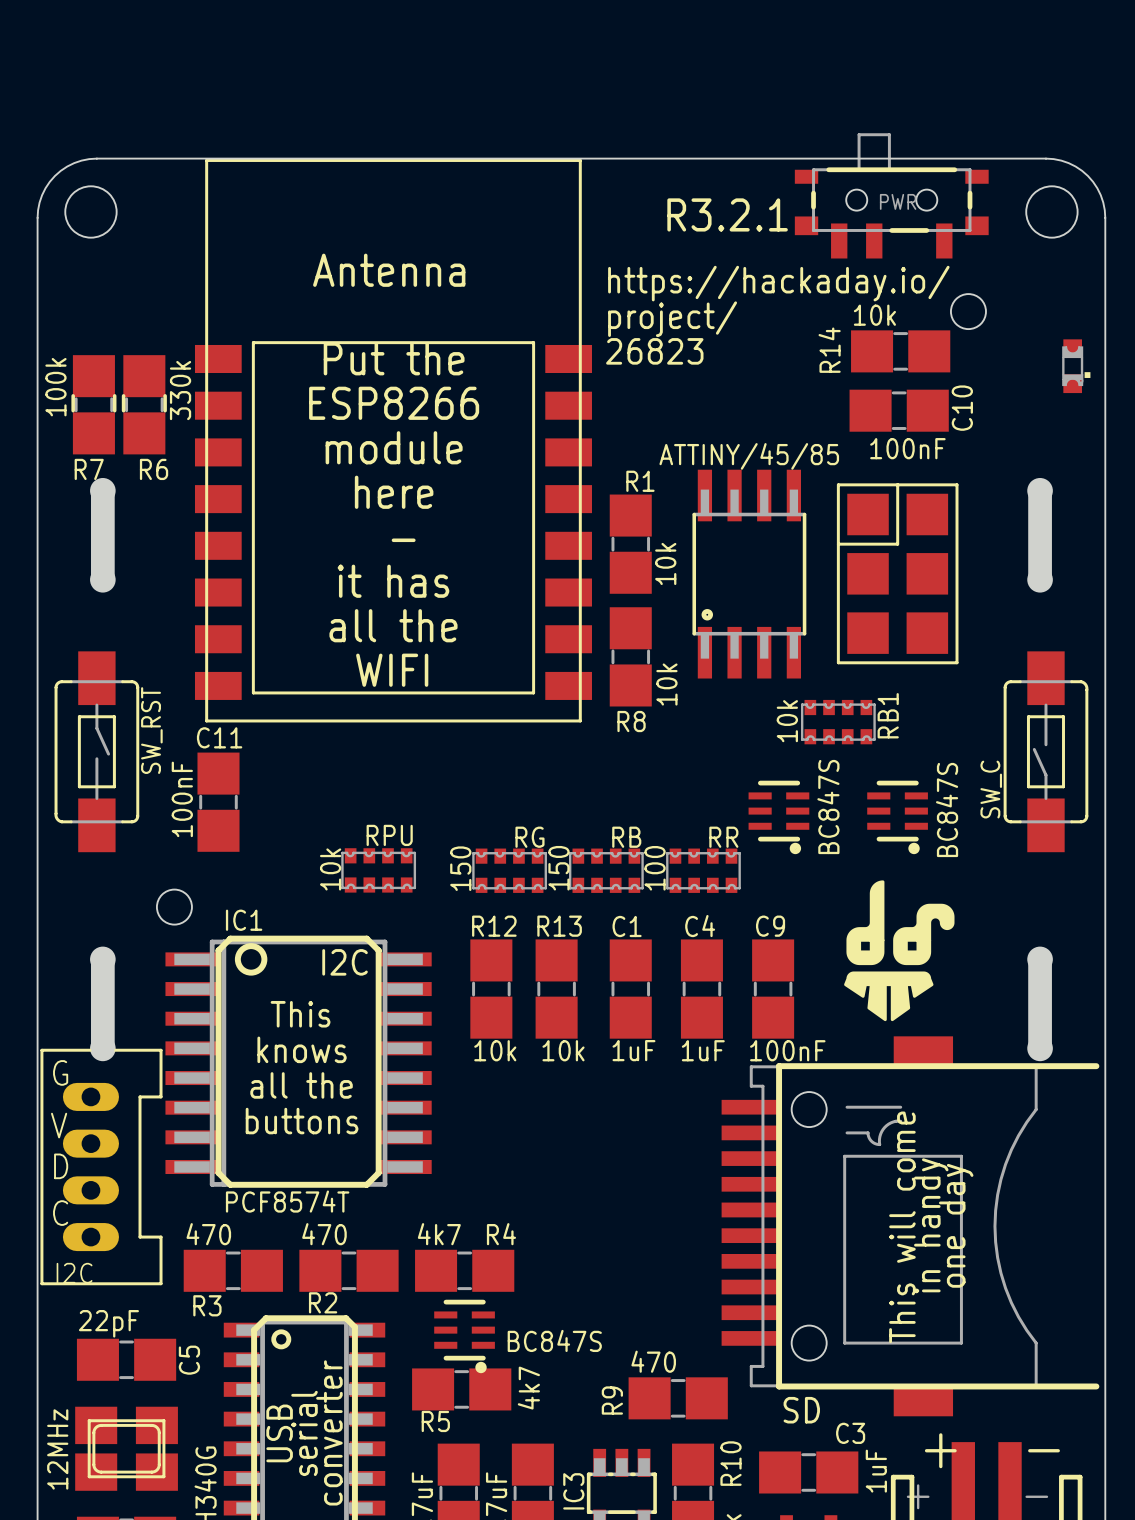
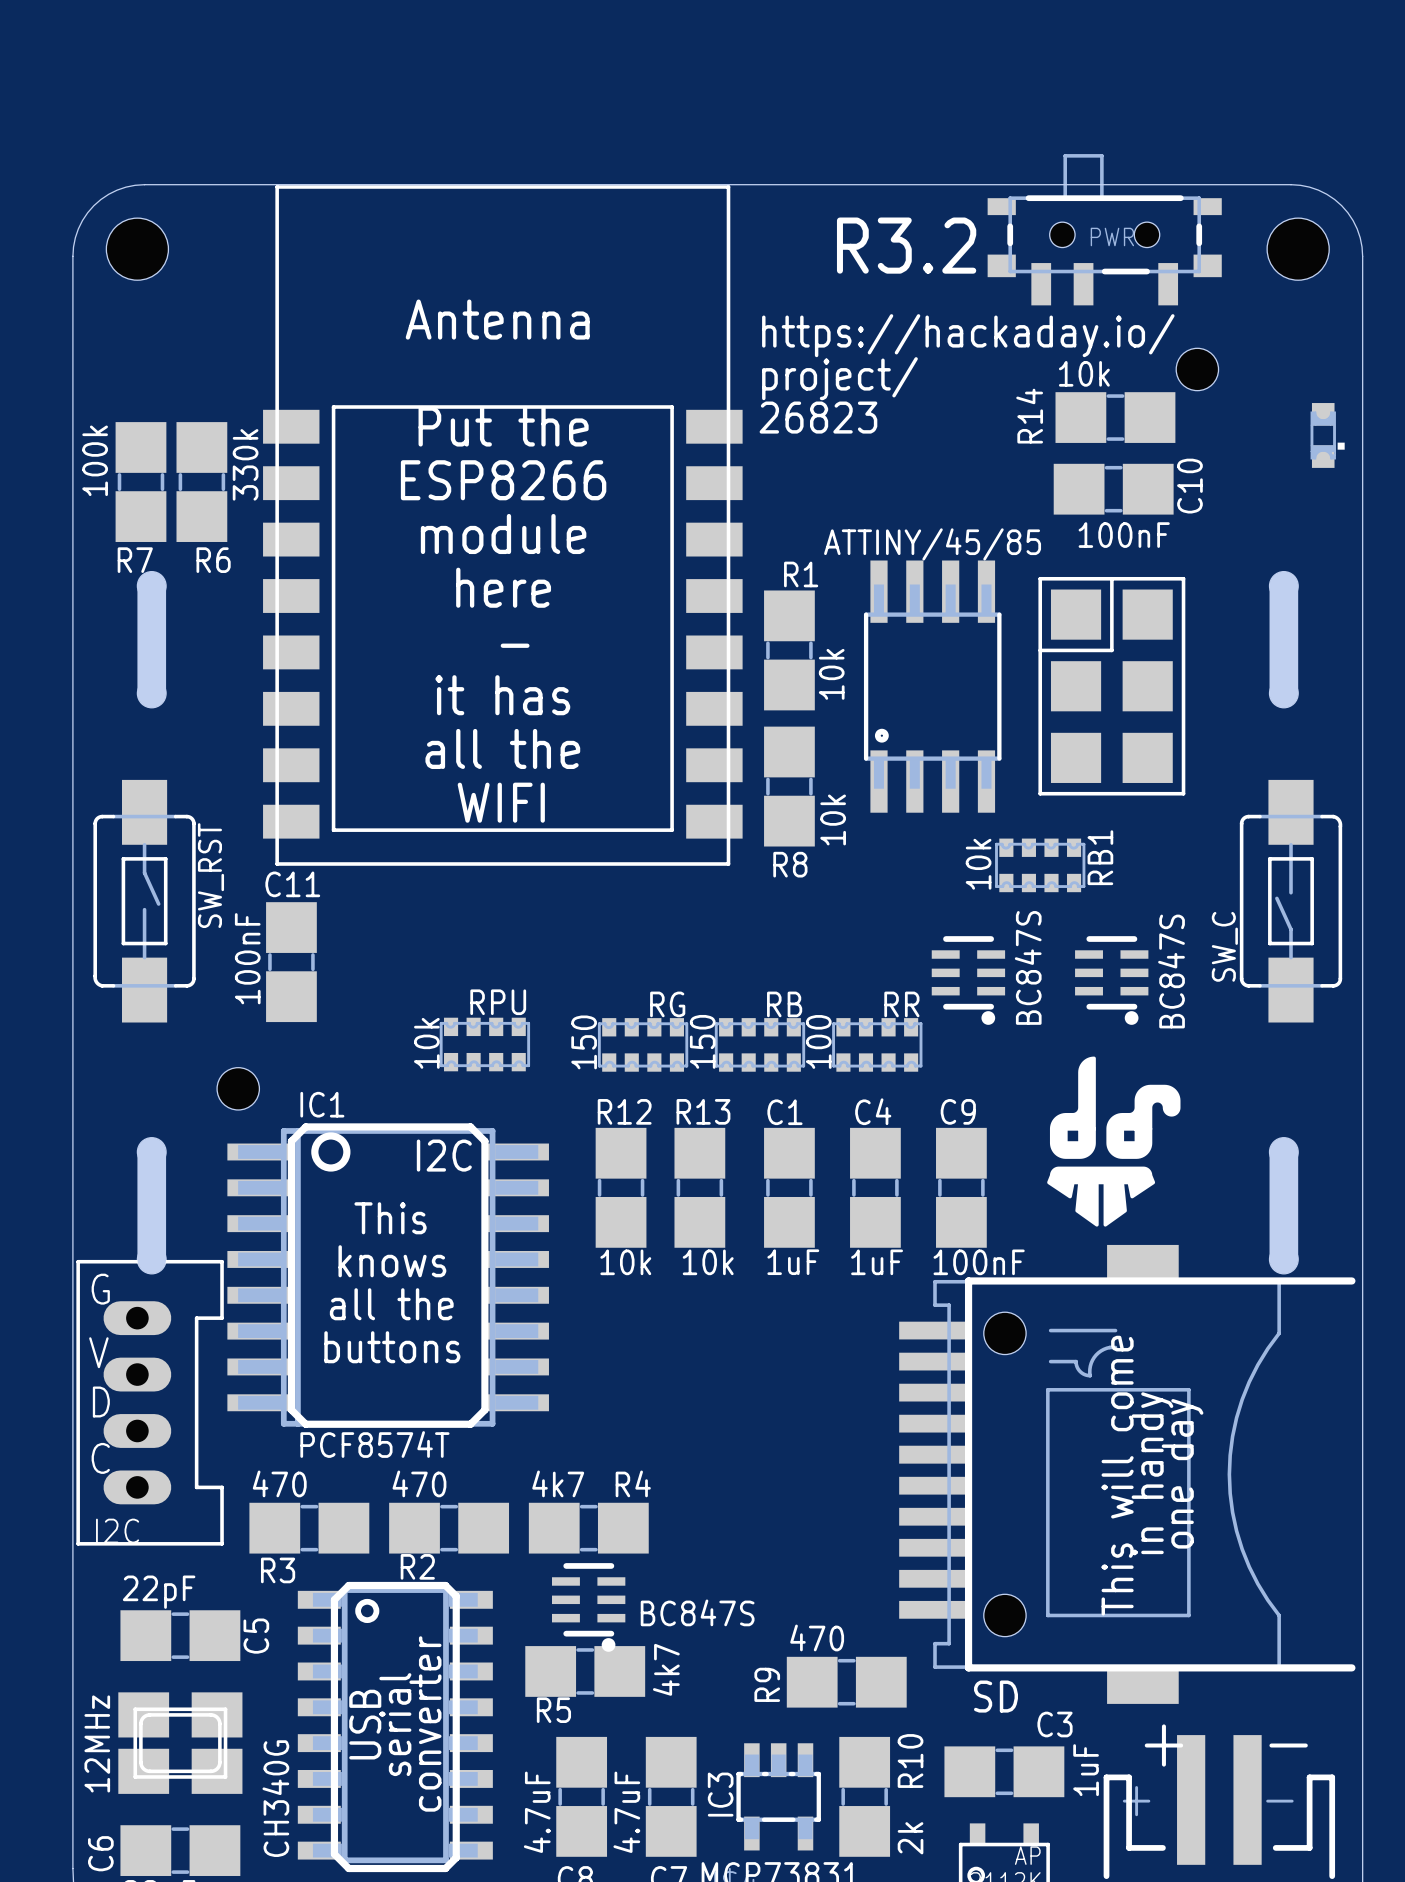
text: R3.2.1 (727, 214) -> R3.2 (906, 245)
line: (73, 395) (73, 410) -> none
line: (114, 395) (114, 410) -> none
line: (123, 395) (123, 410) -> none
line: (165, 395) (165, 410) -> none

